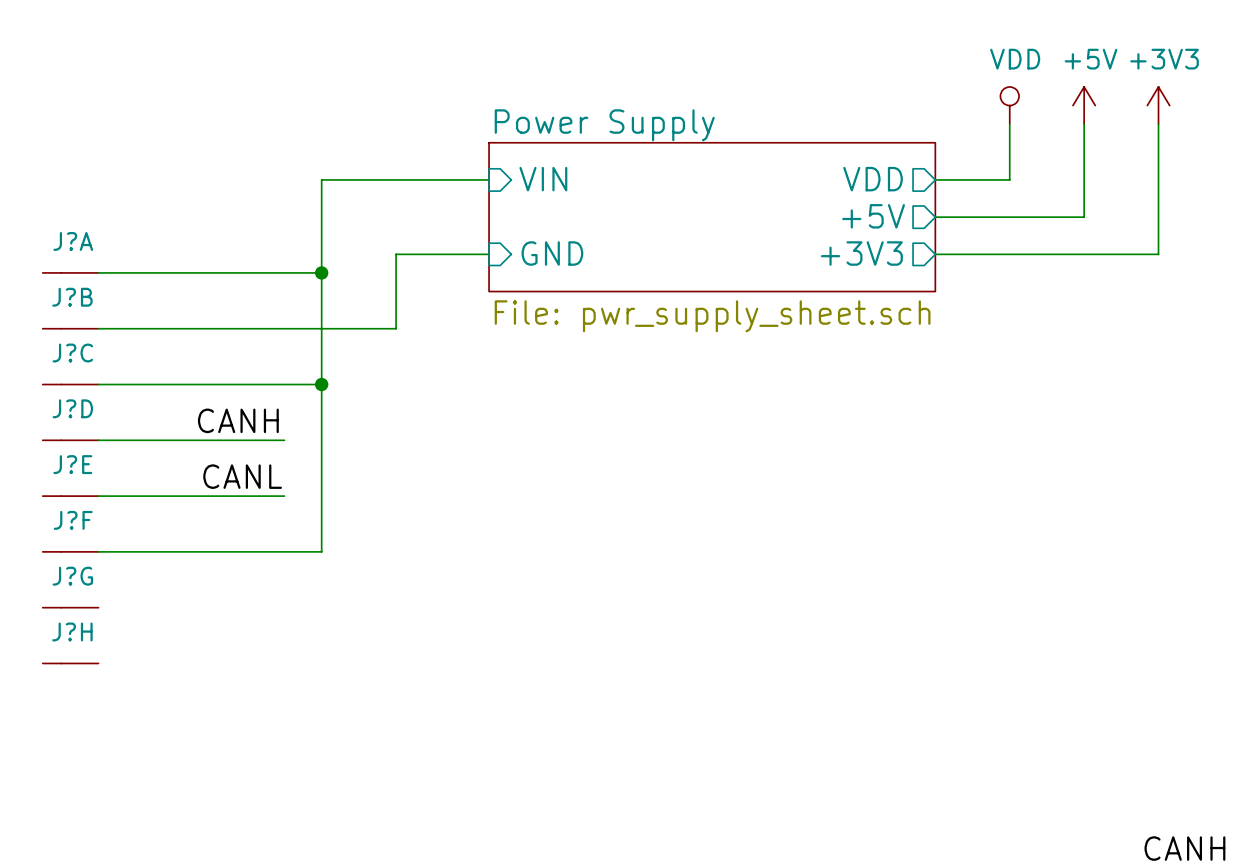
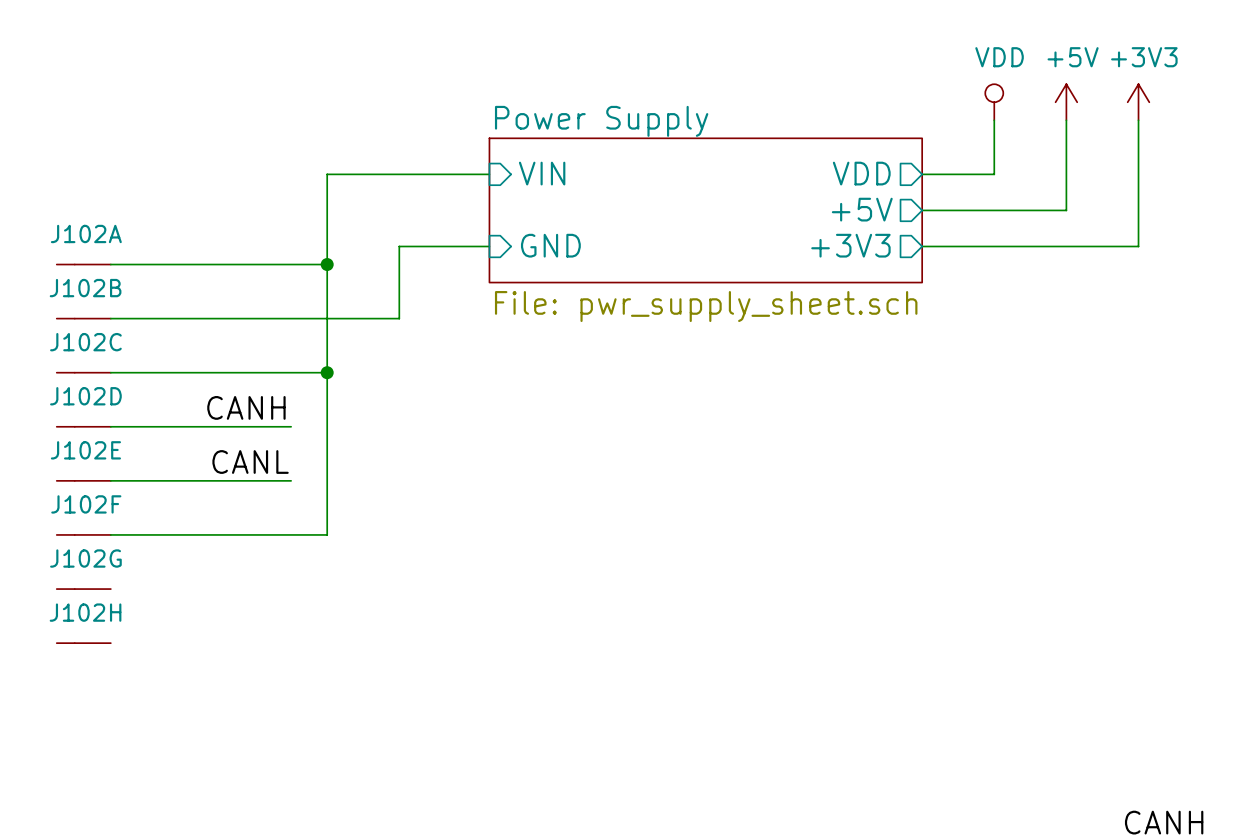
J?A name: J?A (73, 241) -> J102A (86, 233)
J?B name: J?B (72, 297) -> J102B (85, 288)
J?C name: J?C (72, 353) -> J102C (85, 342)
J?D name: J?D (72, 408) -> J102D (85, 396)
J?E name: J?E (72, 464) -> J102E (85, 450)
J?F name: J?F (73, 520) -> J102F (86, 504)
J?G name: J?G (72, 576) -> J102G (85, 558)
J?H name: J?H (72, 631) -> J102H (85, 612)

